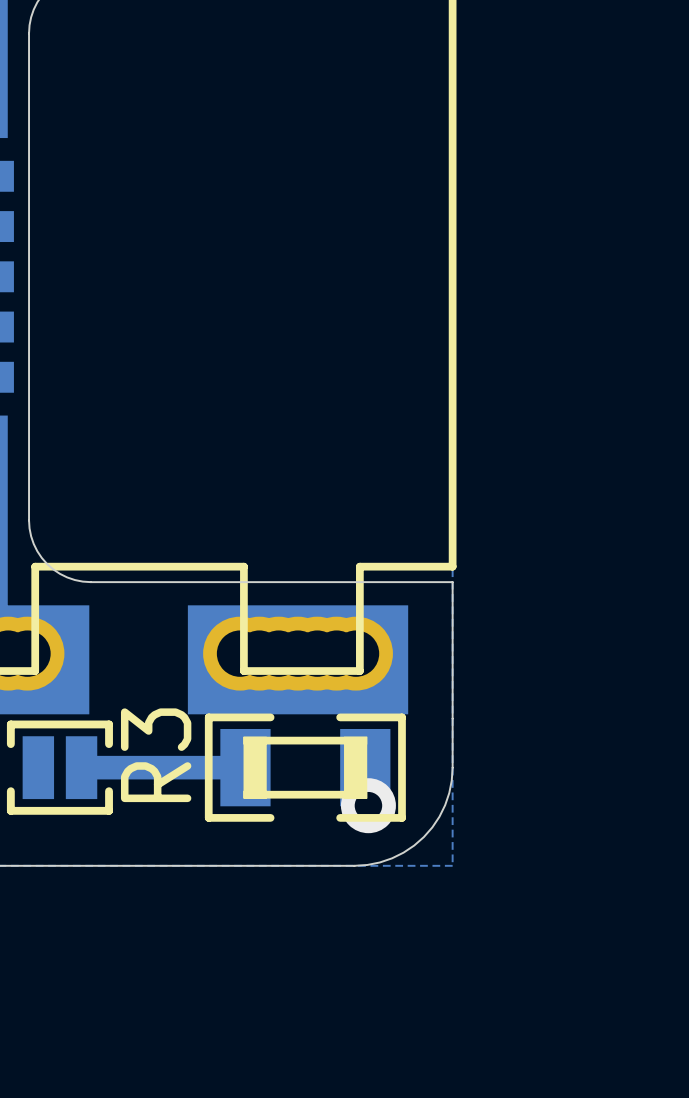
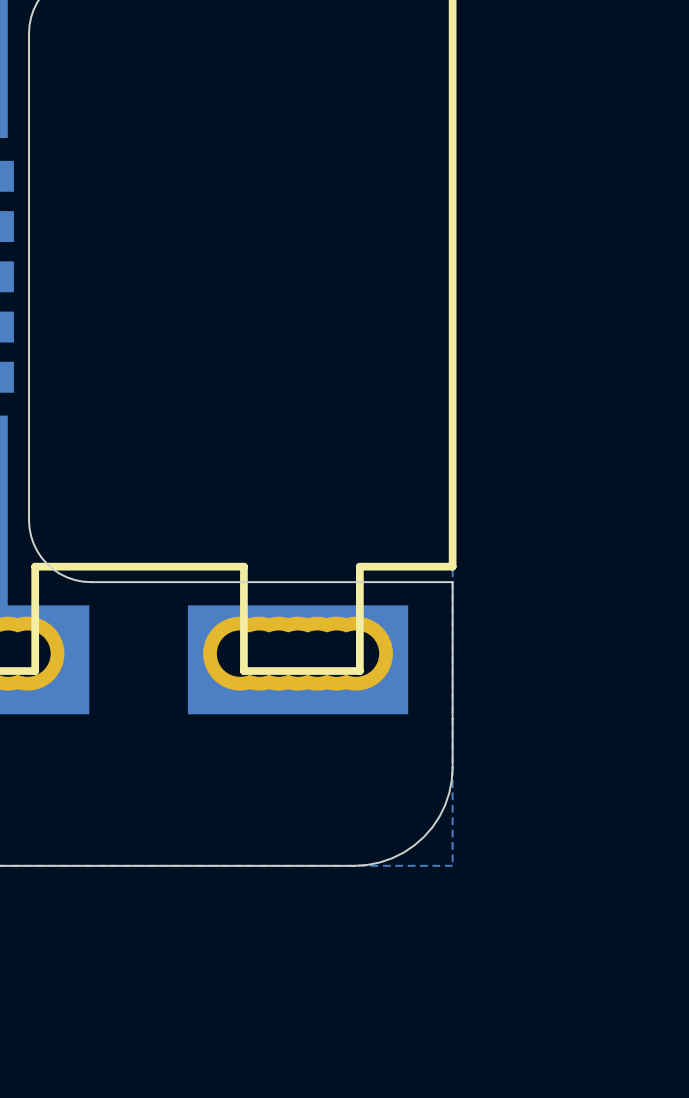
part: (59, 767) -> none
track: (245, 767) (81, 767) -> none
R3: (305, 767) -> none
via: (368, 805) -> none

